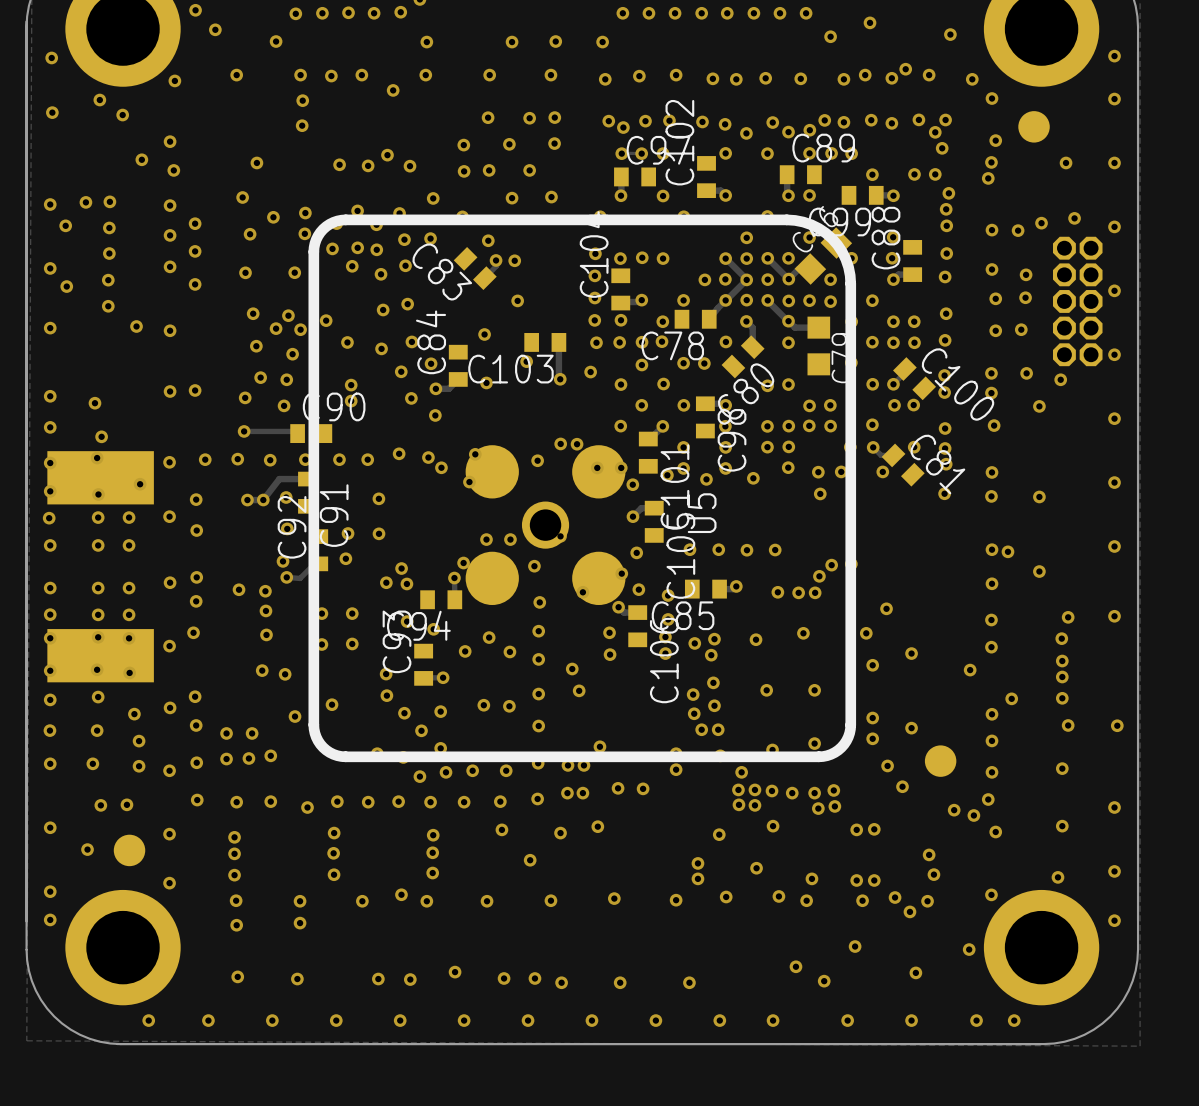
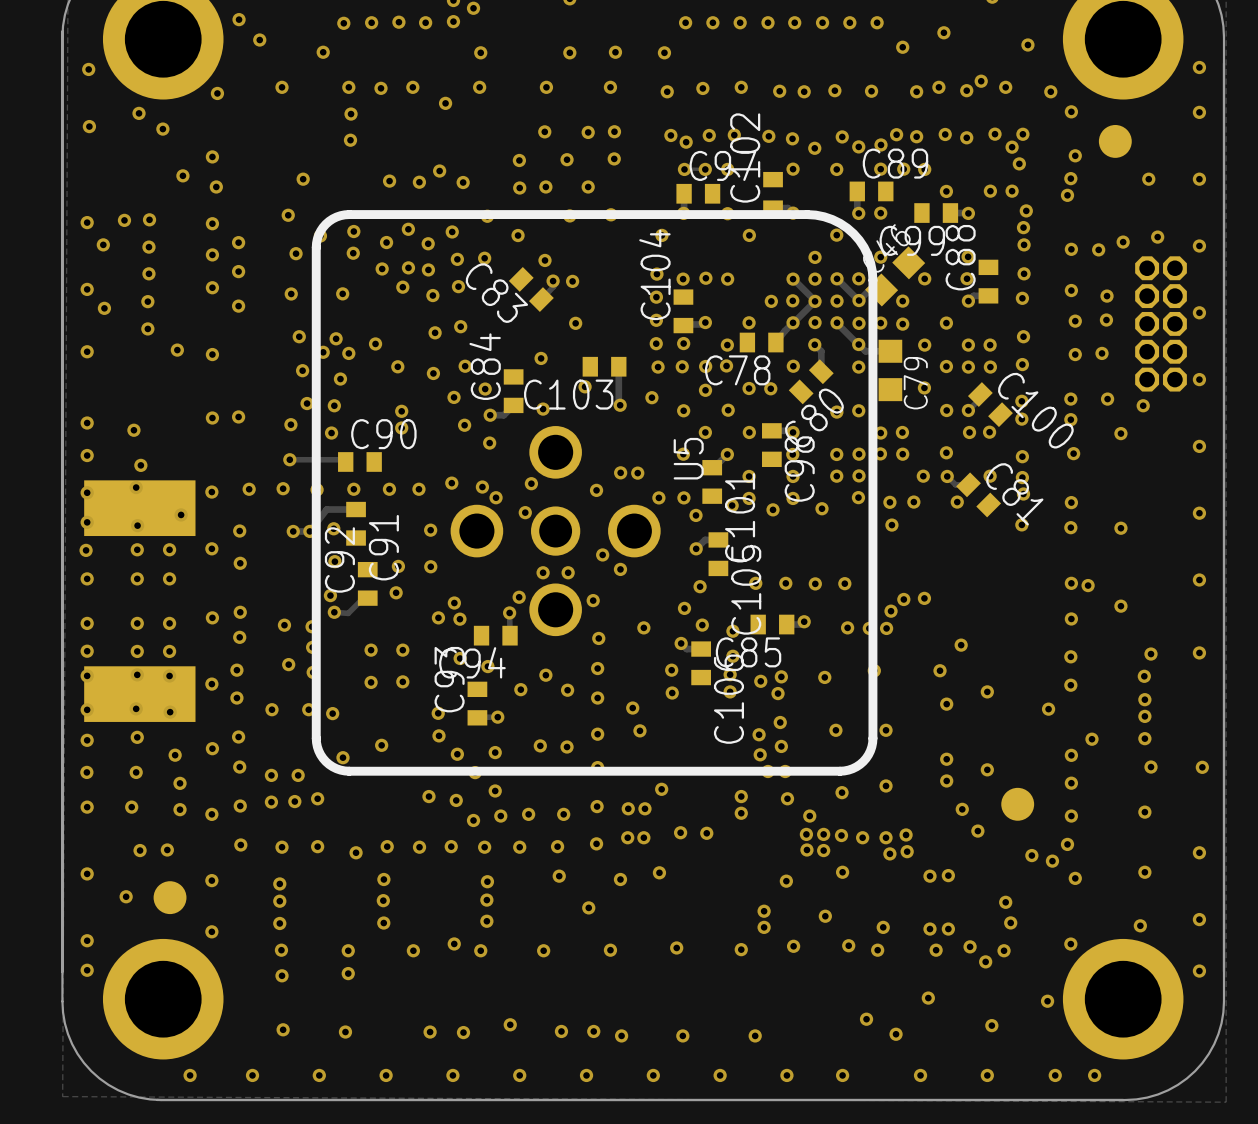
U5 footprint: [308, 214, 857, 763] -> [311, 210, 878, 776]
U5 name position: U5 (702, 513) -> U5 (688, 458)
via: none -> (288, 664)
via: none -> (236, 698)
via: none -> (271, 709)

